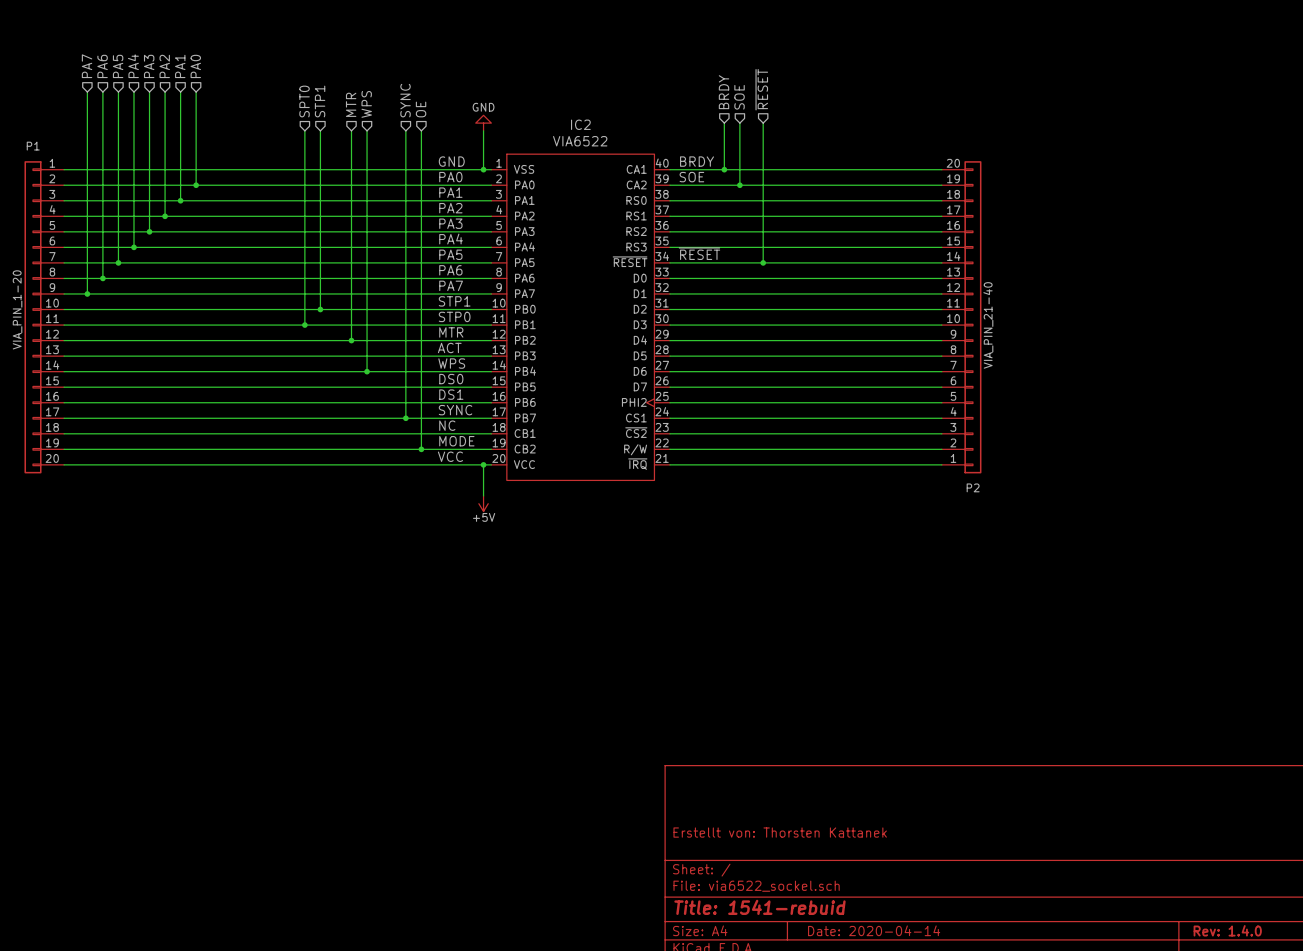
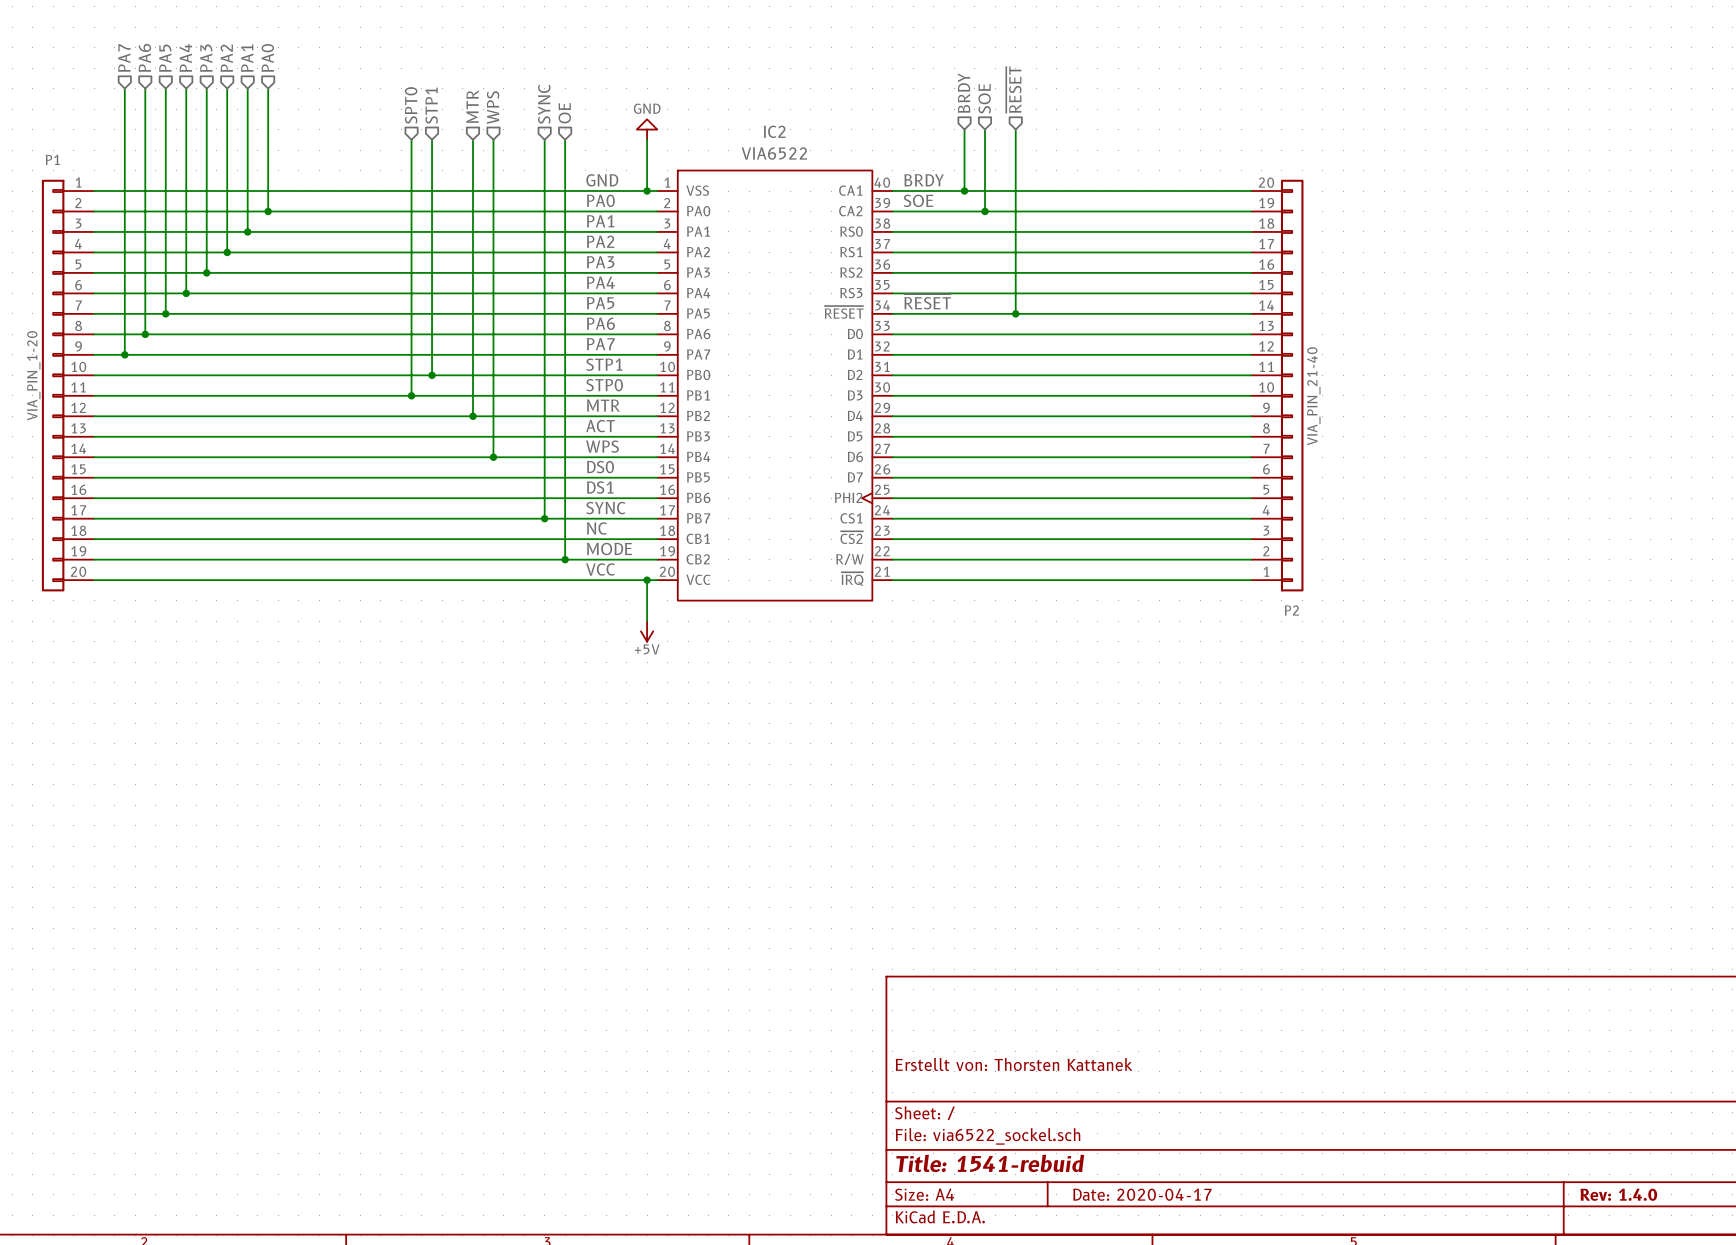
title block: Date: 2020-04-14 (874, 930) -> Date: 2020-04-17 (1142, 1194)

